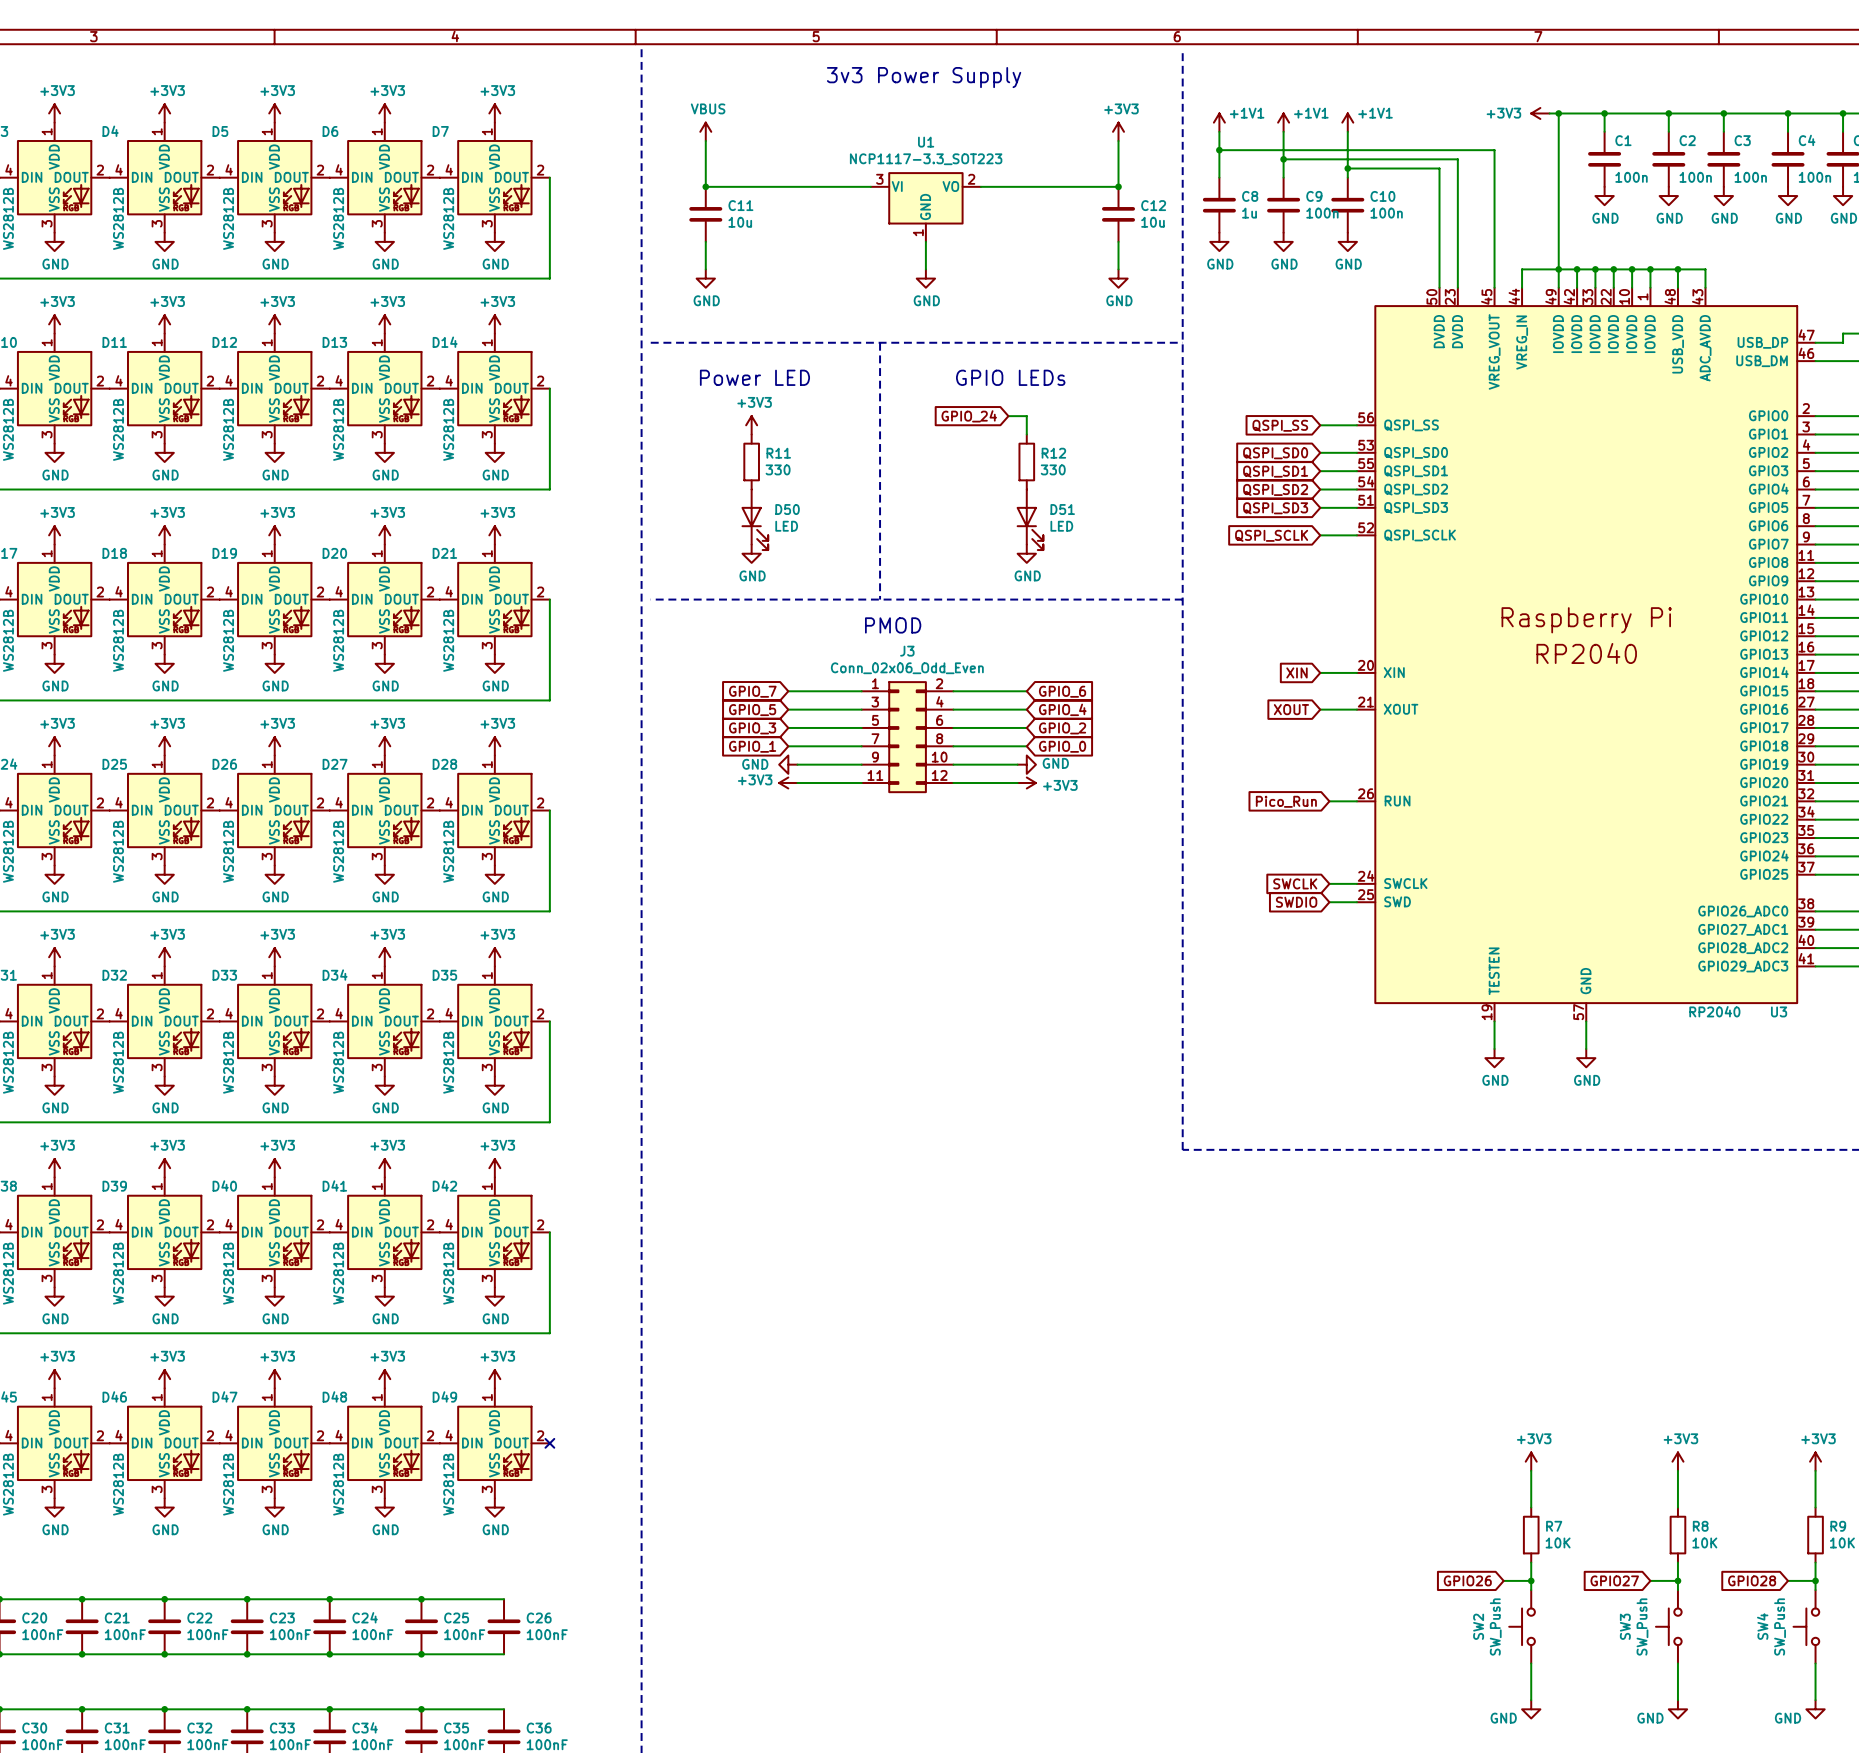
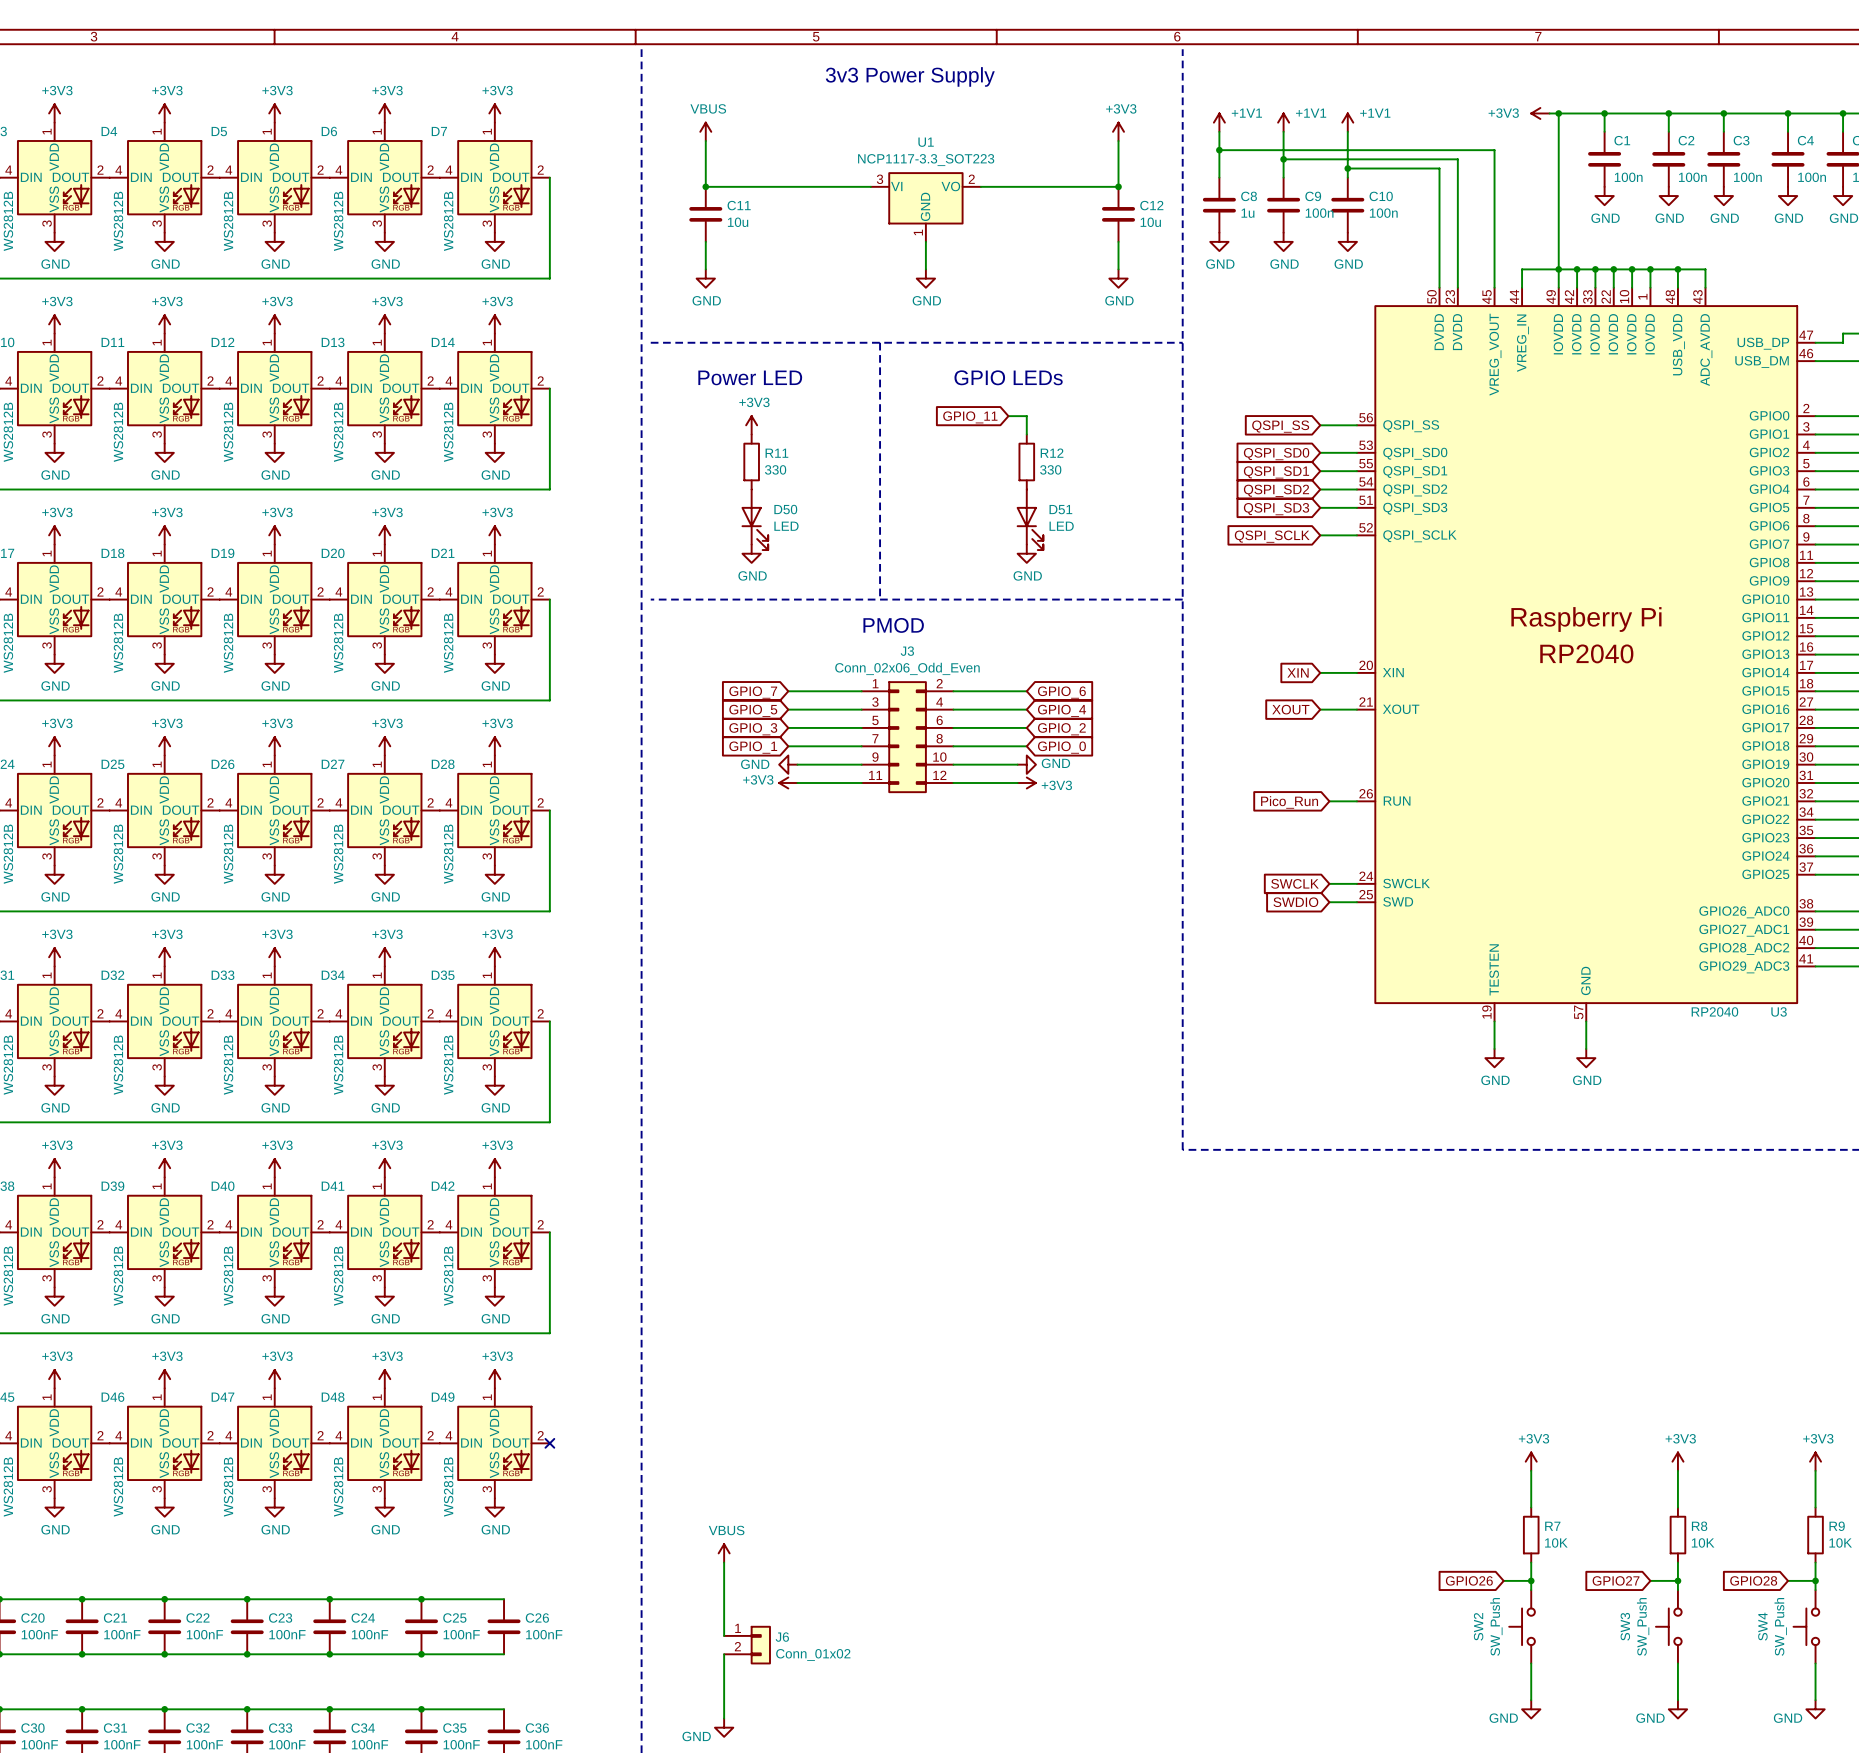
global label: GPIO_24 (969, 416) -> GPIO_11 (970, 417)
power symbol: none -> VBUS (724, 1553)
wire: none -> (724, 1562) (724, 1635)
J6: none -> Conn_01x02 (747, 1645)
wire: none -> (724, 1654) (724, 1718)
power symbol: none -> GND (724, 1727)

